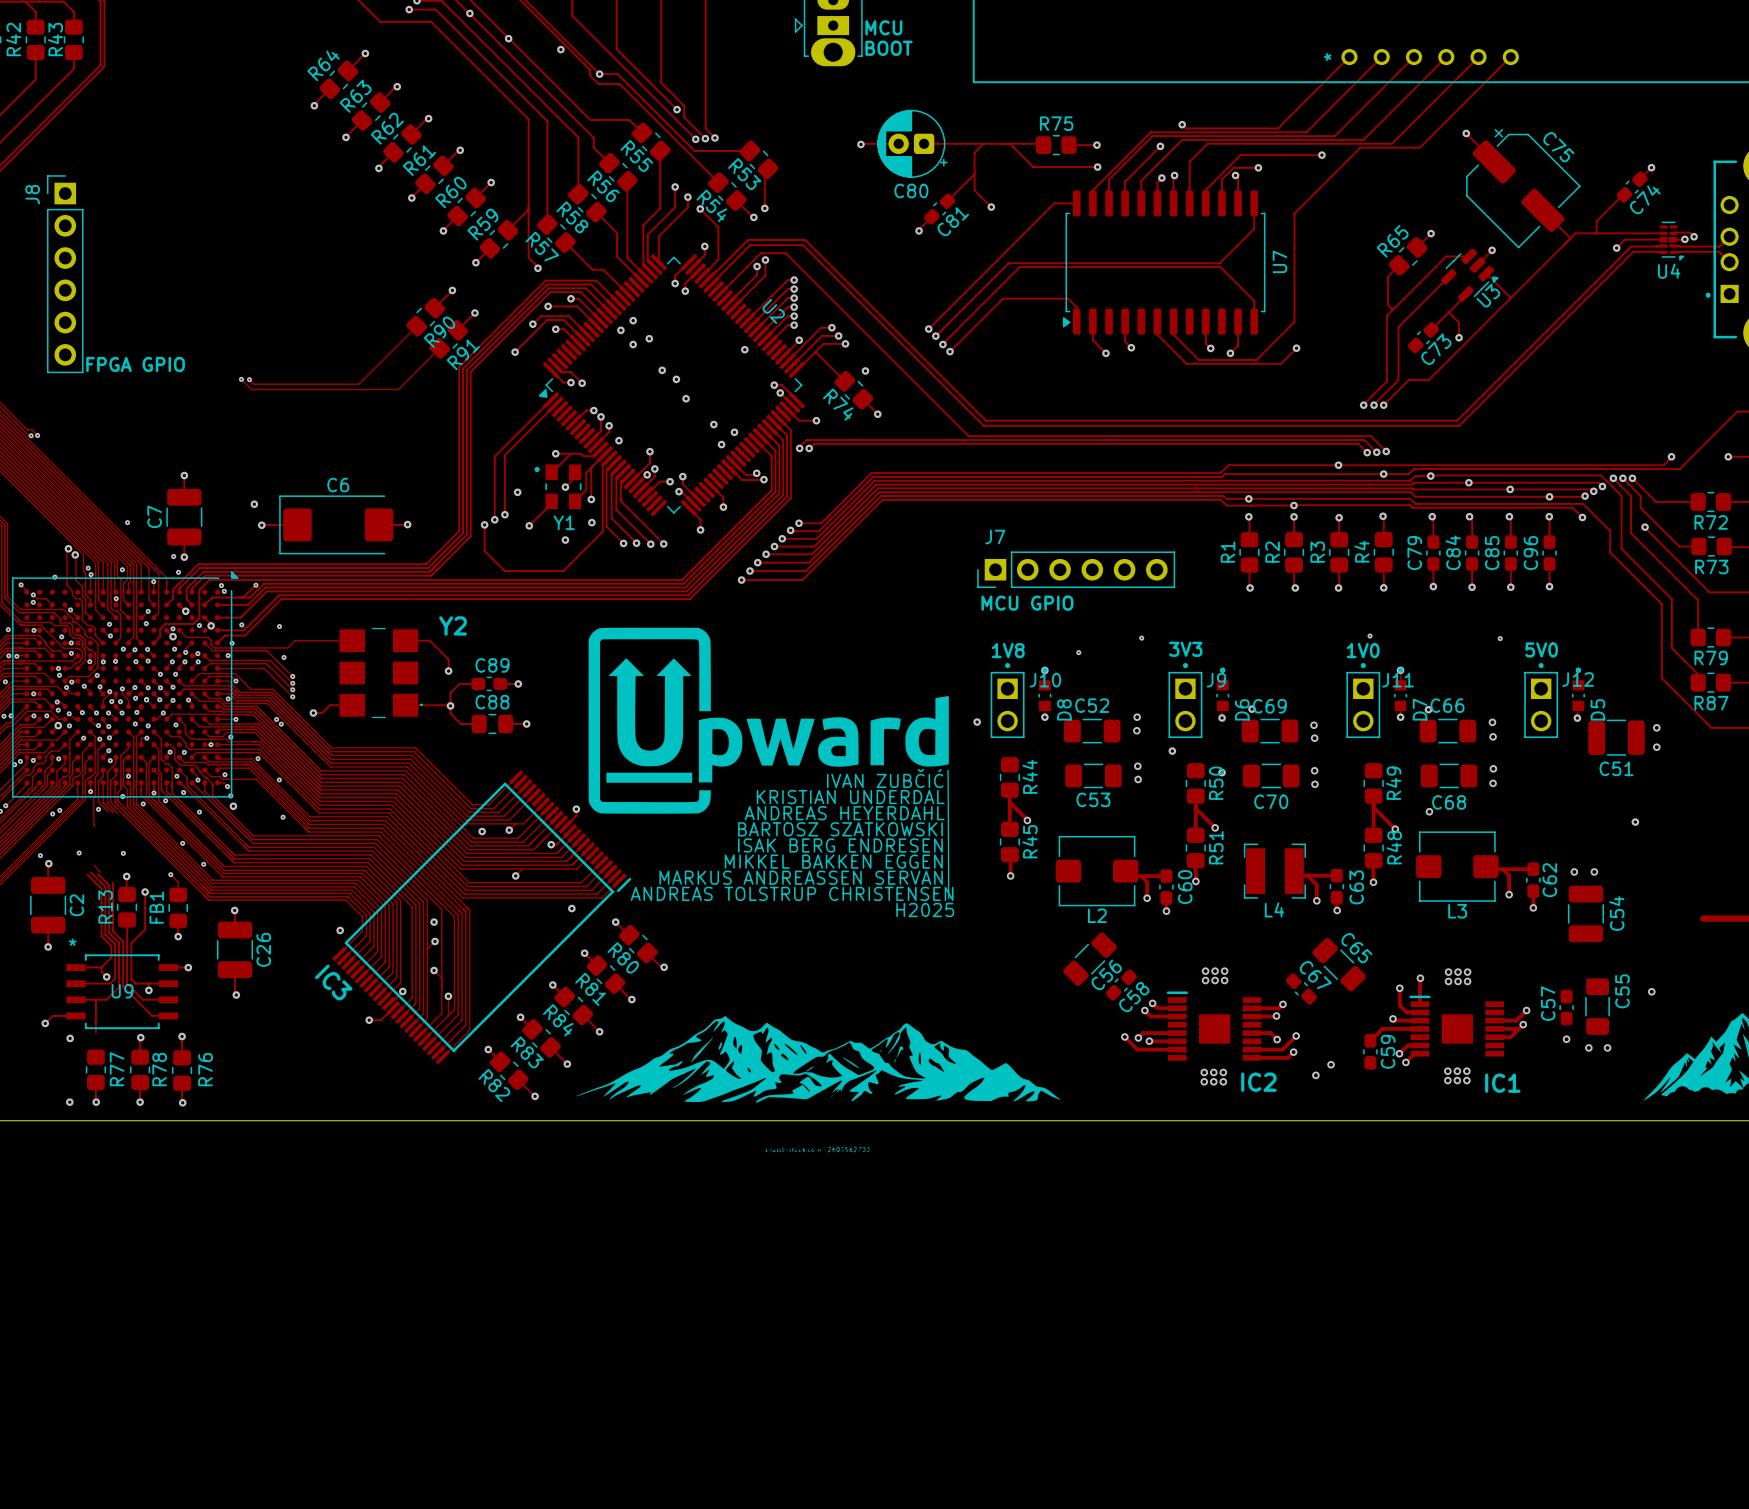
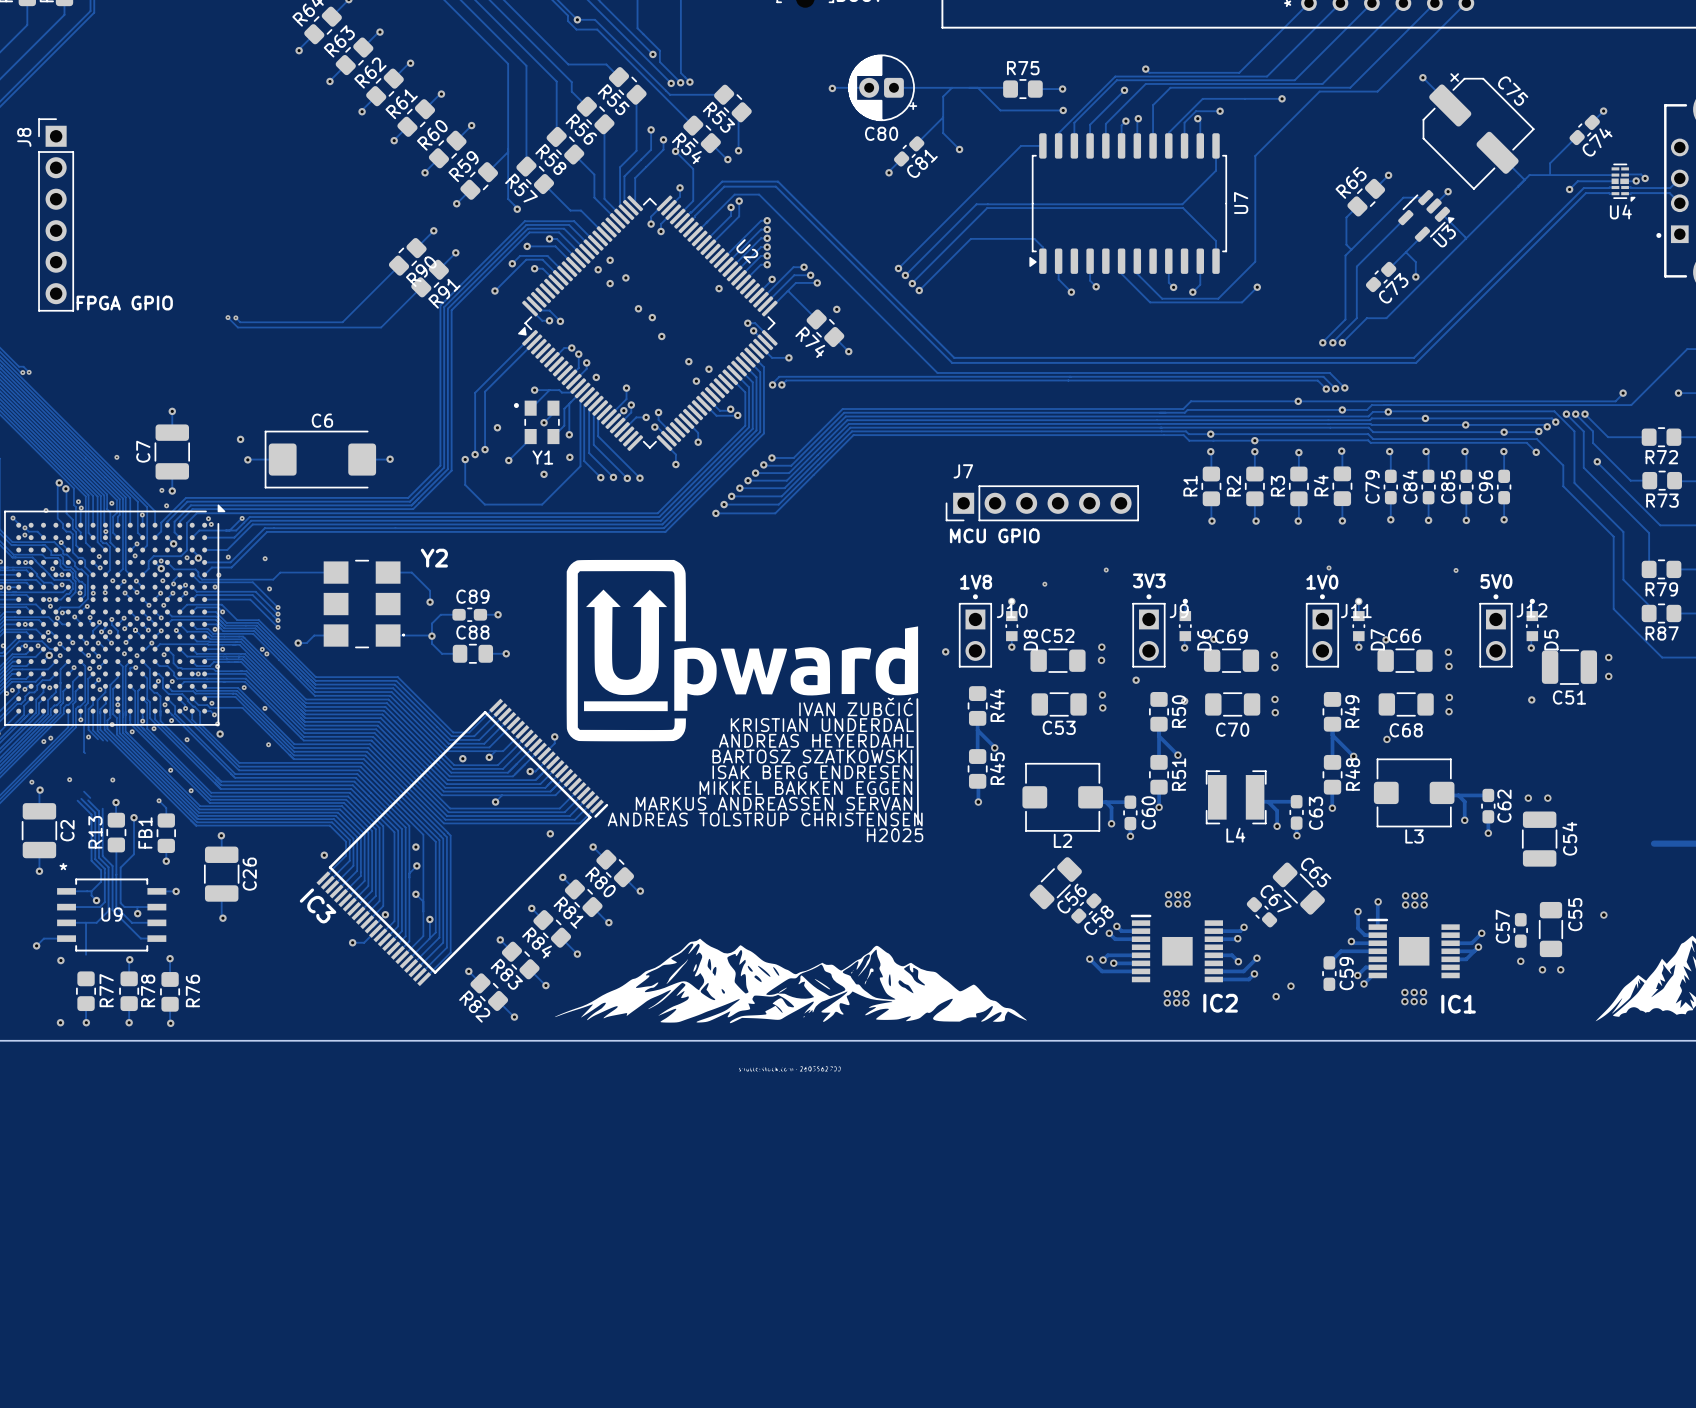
via: none -> (1531, 699)
via: (1635, 822) -> none

